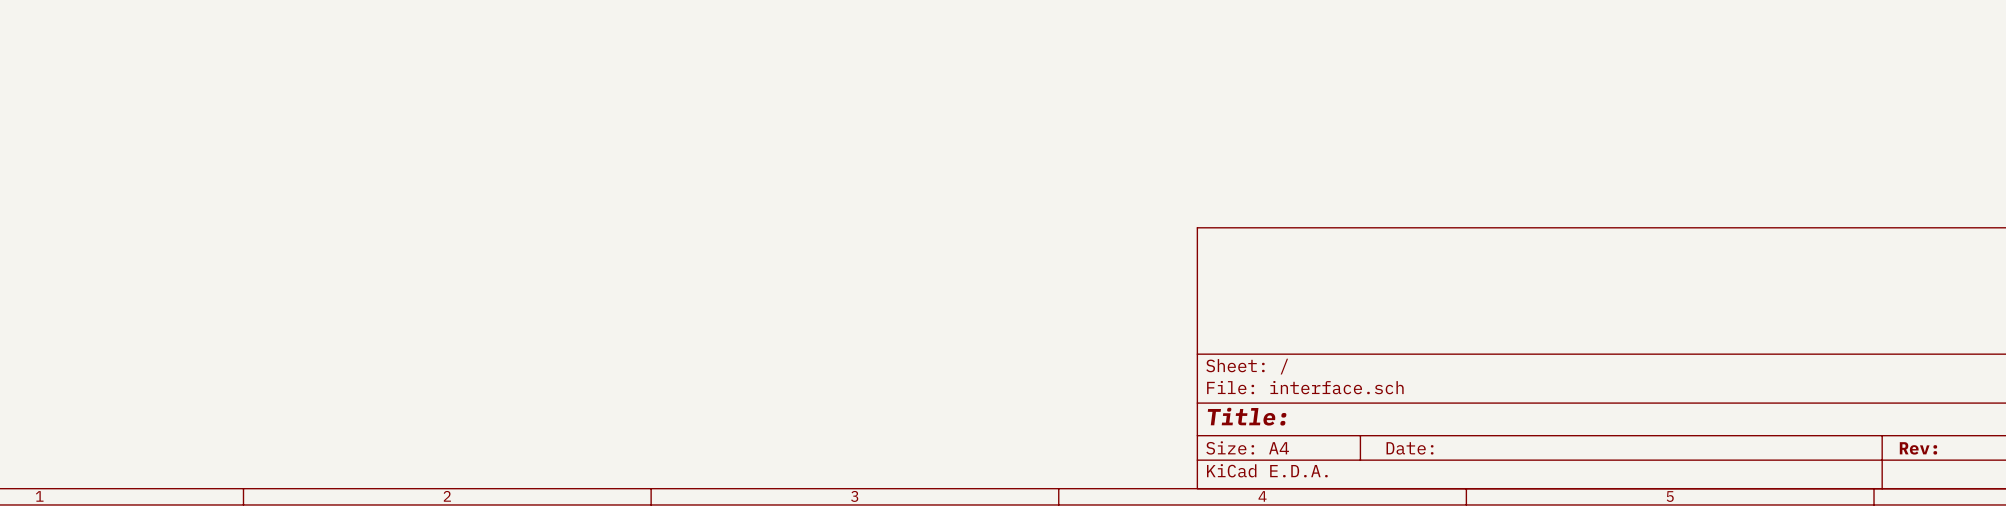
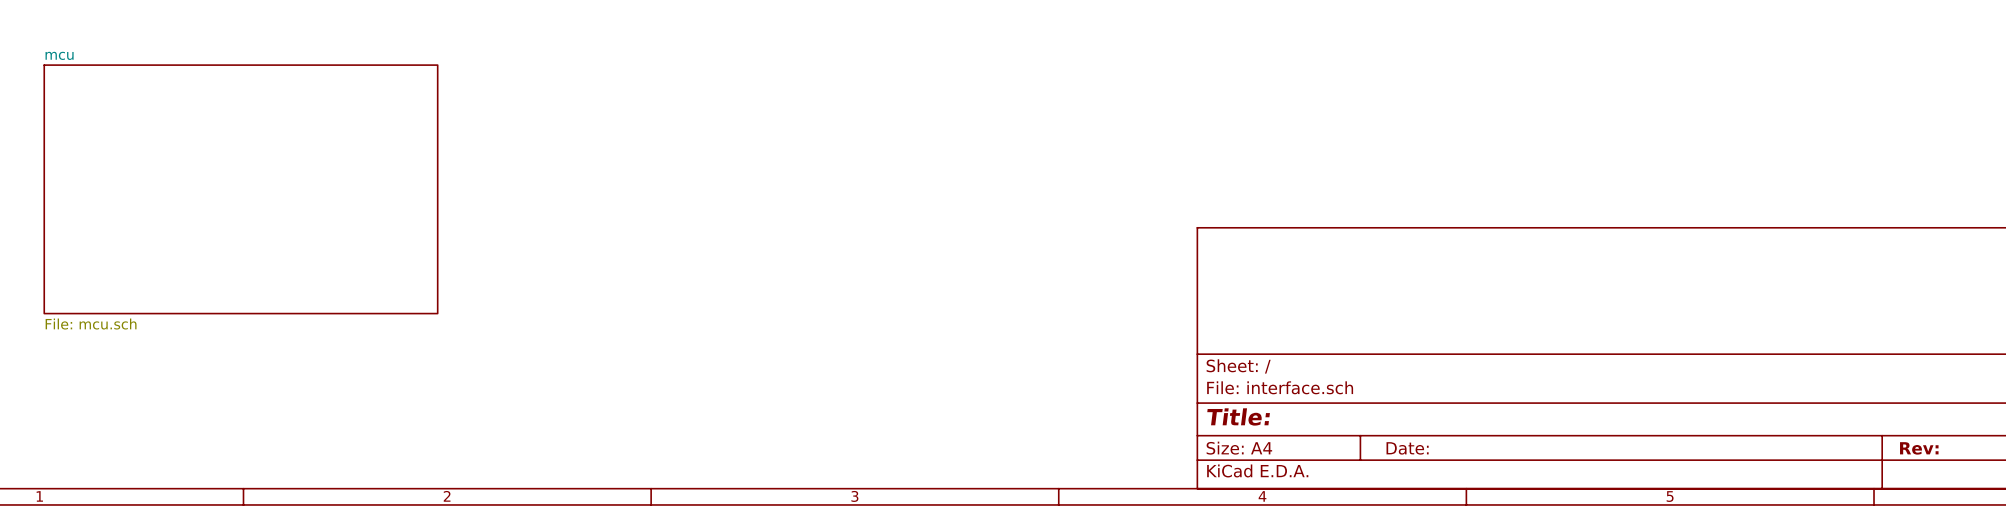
sheet mcu: none -> File: mcu.sch (240, 189)

